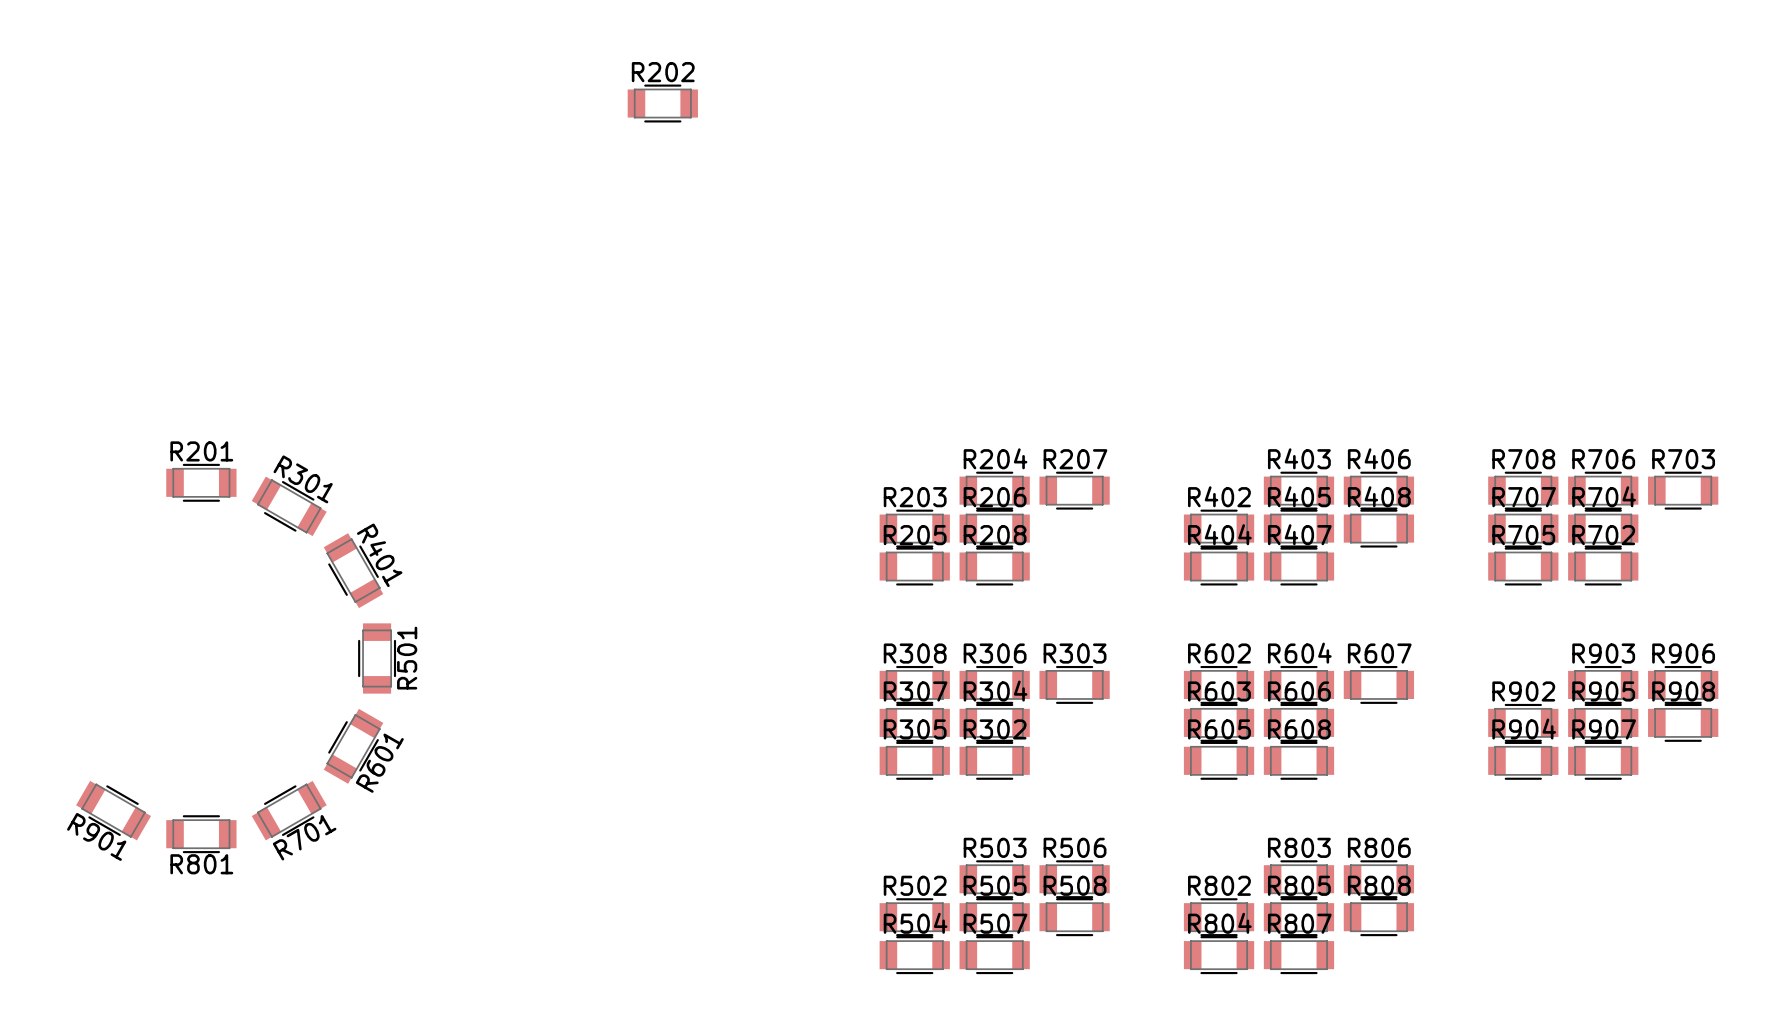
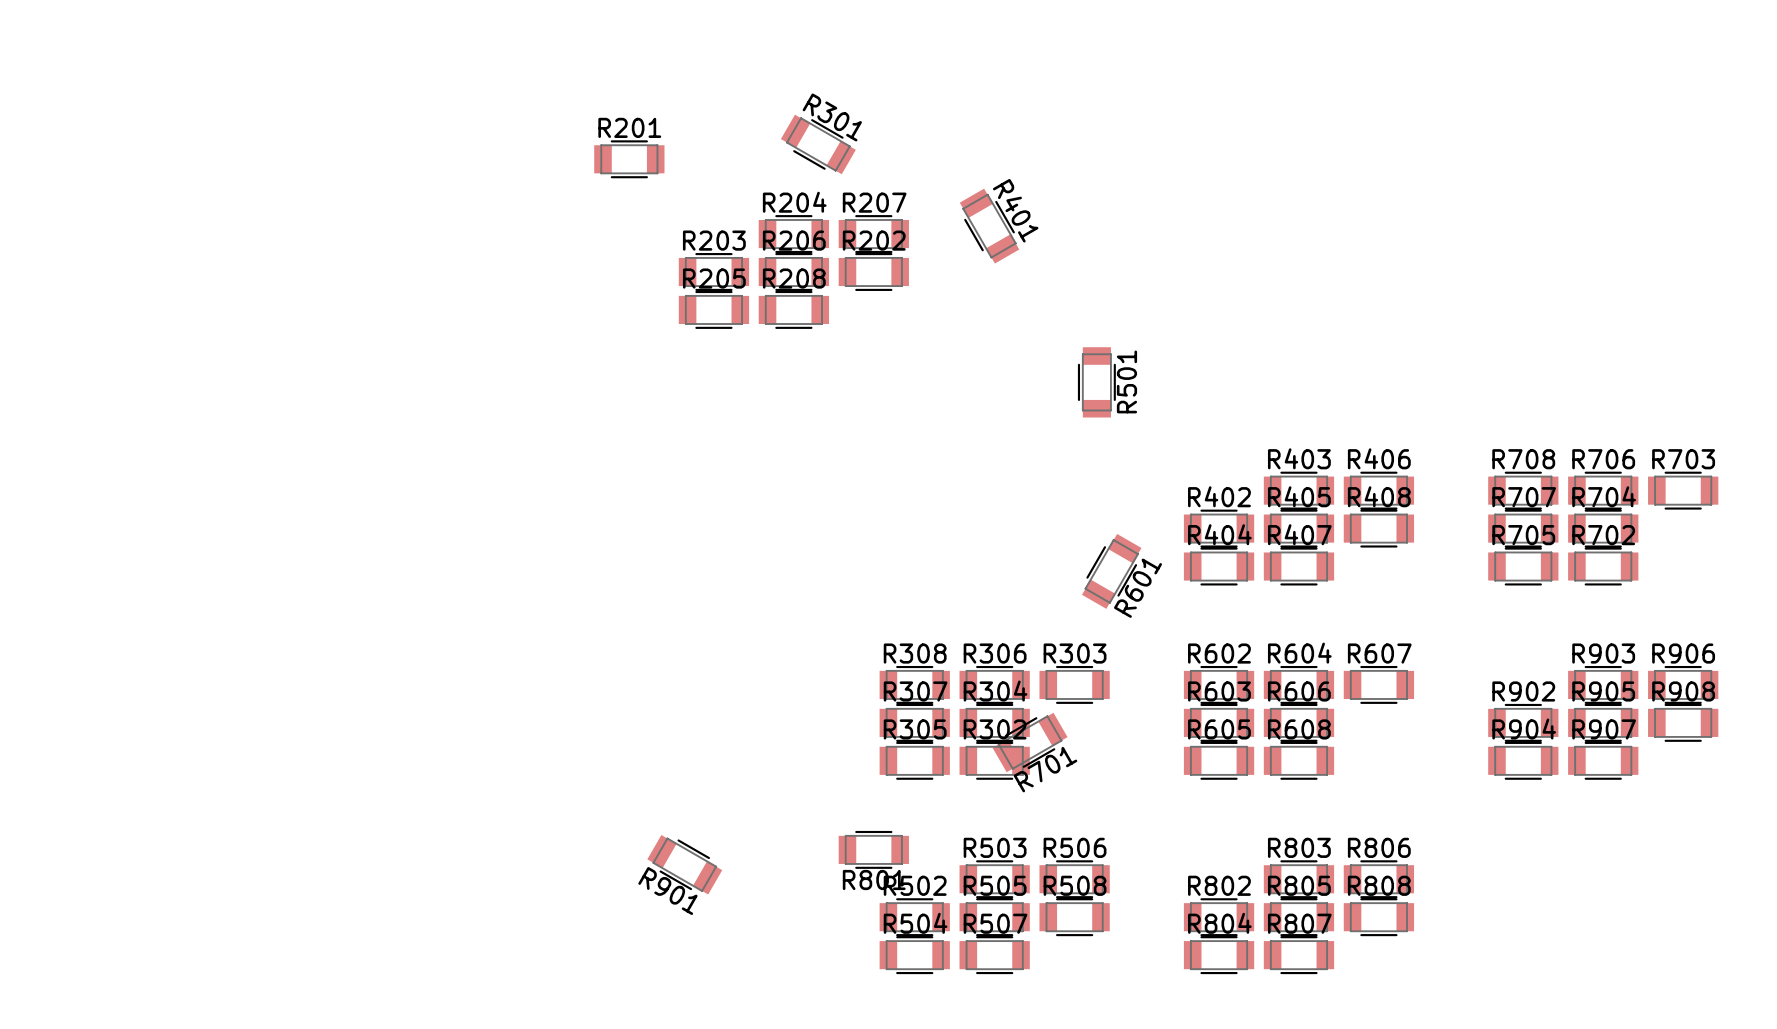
R202 position: (662, 103) -> (873, 272)
R201 position: (201, 482) -> (629, 159)
R204 position: (994, 490) -> (793, 234)
R207 position: (1074, 490) -> (873, 234)
R301 position: (289, 506) -> (818, 144)
R203 position: (914, 528) -> (713, 272)
R206 position: (994, 528) -> (793, 272)
R205 position: (914, 566) -> (713, 309)
R208 position: (994, 566) -> (793, 309)
R401 position: (353, 570) -> (989, 226)
R501 position: (377, 658) -> (1096, 382)
R601 position: (353, 746) -> (1111, 571)
R901 position: (113, 810) -> (684, 864)
R701 position: (289, 810) -> (1030, 742)
R801 position: (201, 834) -> (873, 849)

